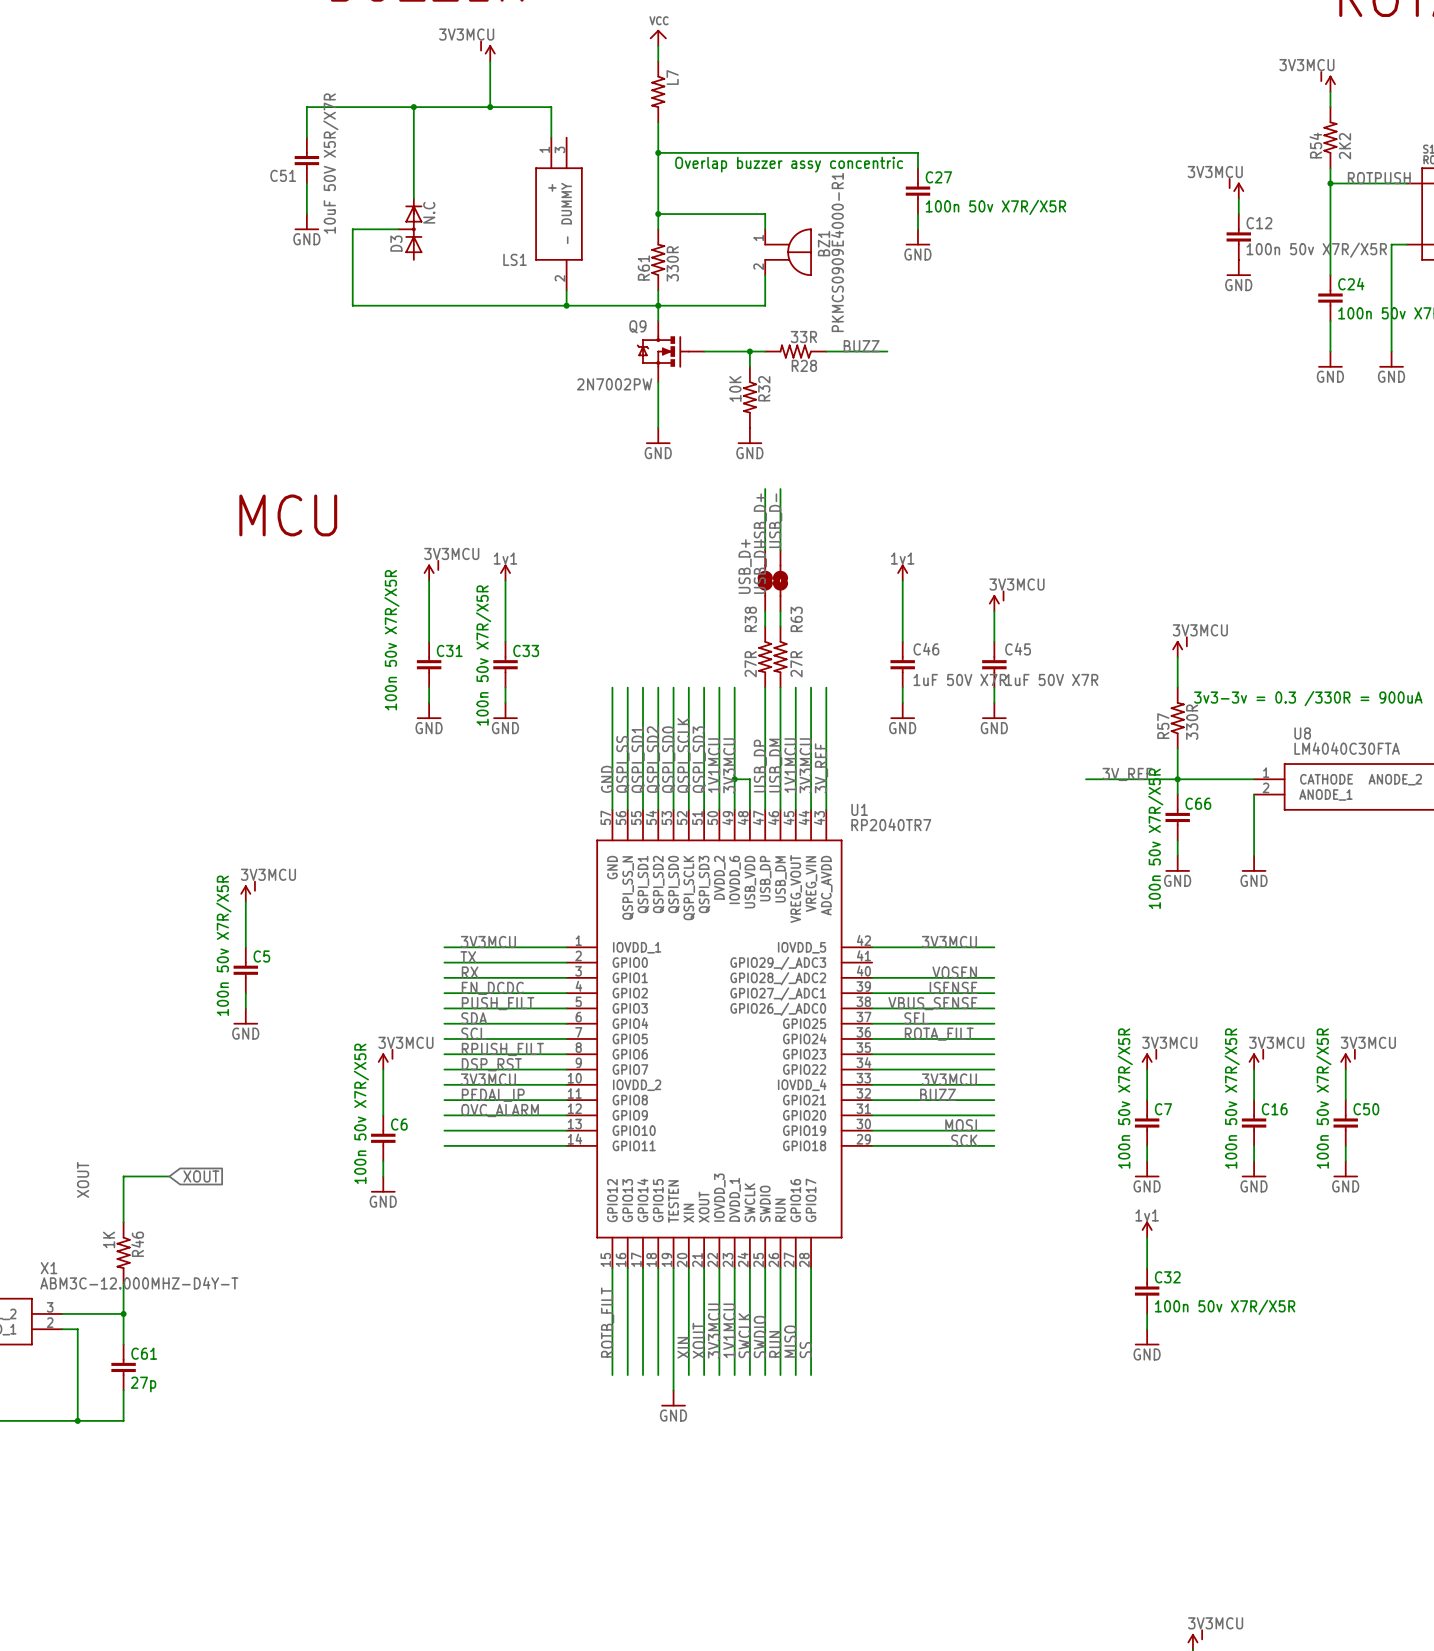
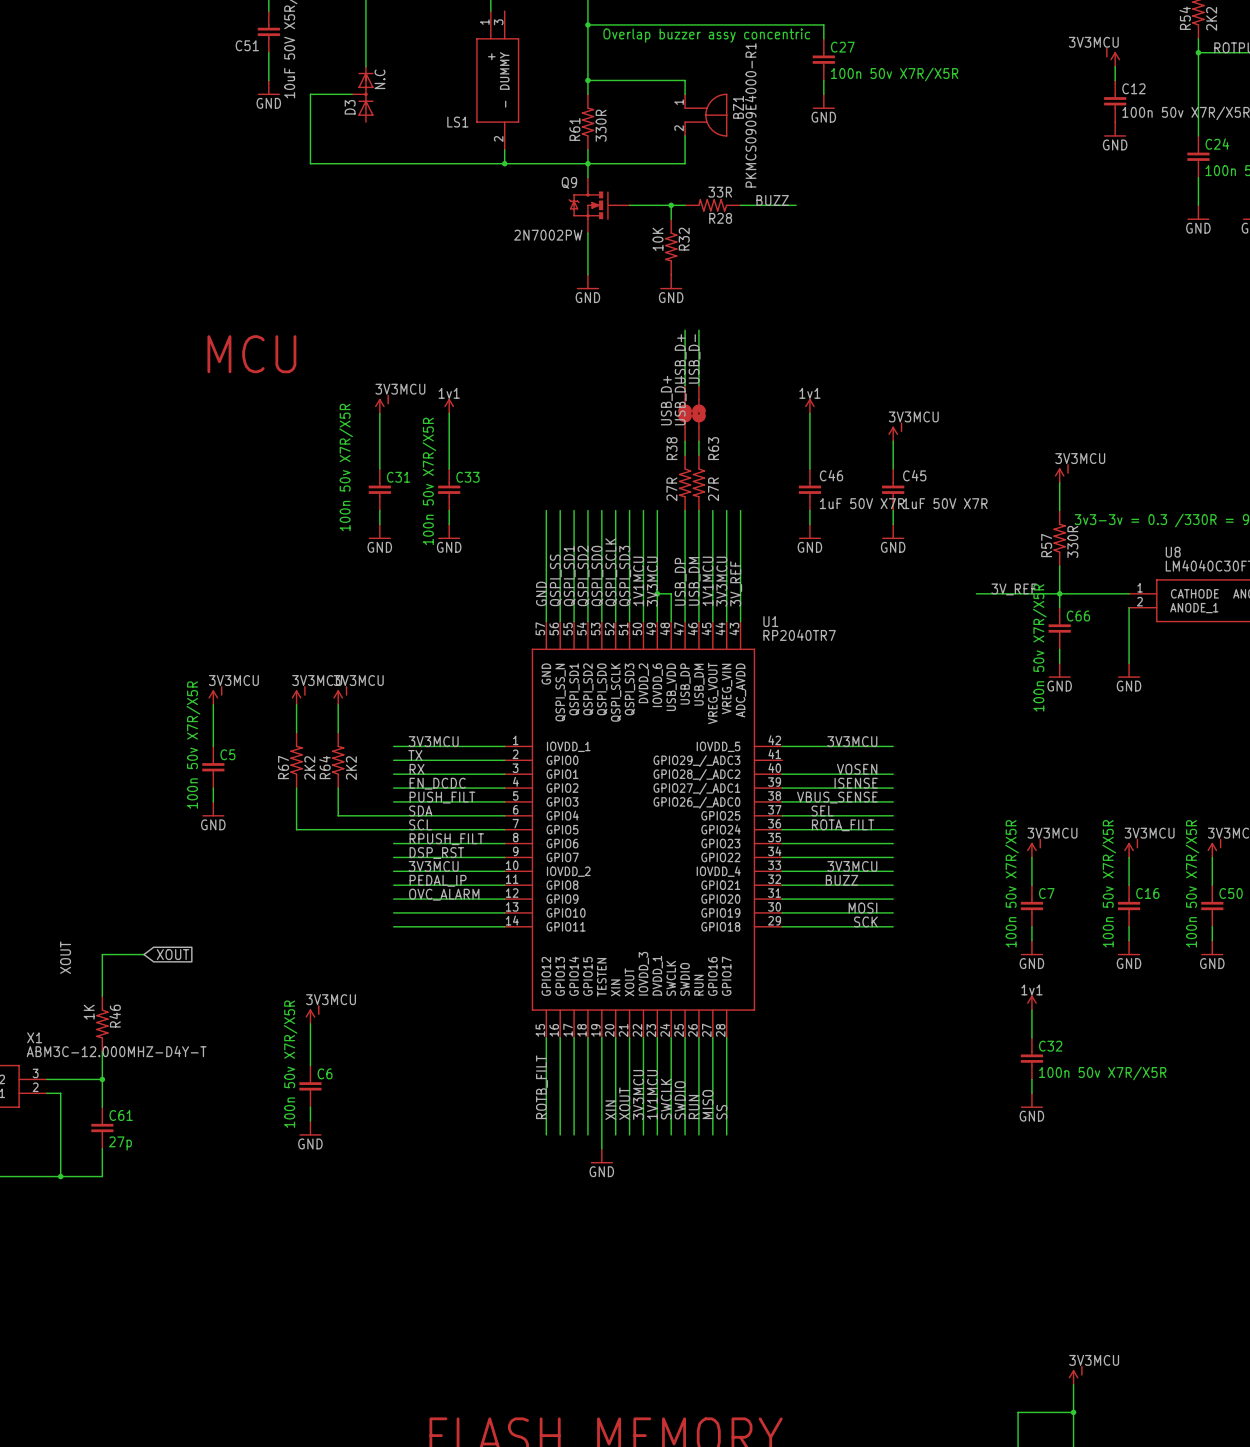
power symbol: none -> 3V3MCU (298, 695)
power symbol: none -> 3V3MCU (340, 695)
wire: none -> (296, 704) (296, 732)
wire: none -> (338, 704) (338, 732)
R67: none -> 2K2 (296, 760)
R64: none -> 2K2 (338, 760)
wire: none -> (296, 788) (296, 829) (393, 829)
wire: none -> (338, 788) (338, 815) (393, 815)
power symbol: 3V3MCU (385, 1059) -> none
wire: (383, 1069) (383, 1115) -> none
C6 position: (383, 1138) -> (310, 1086)
wire: (383, 1161) (383, 1176) -> none
power symbol: GND (383, 1184) -> none
power symbol: none -> 3V3MCU (312, 1014)
wire: none -> (310, 1023) (310, 1065)
wire: none -> (310, 1107) (310, 1121)
power symbol: none -> GND (310, 1128)

